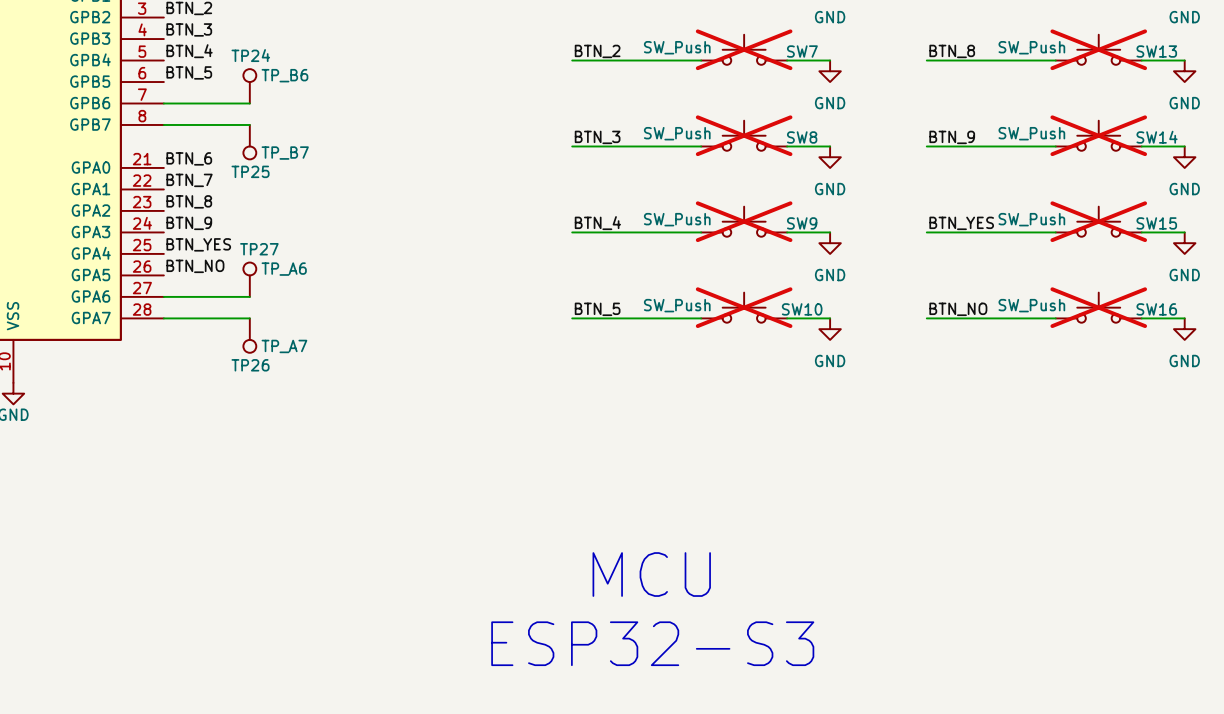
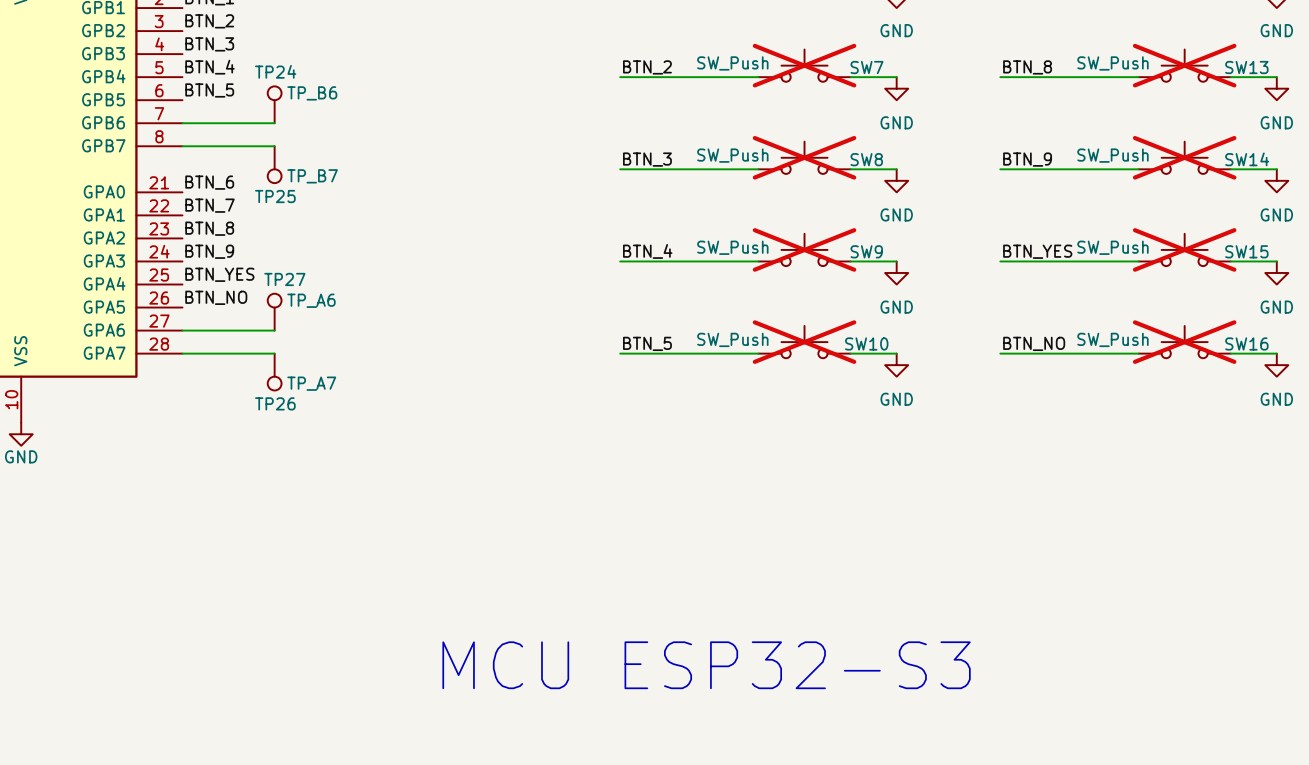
text: MCU (651, 574) -> none
text: ESP32-S3 (652, 643) -> MCU ESP32-S3 (706, 665)

